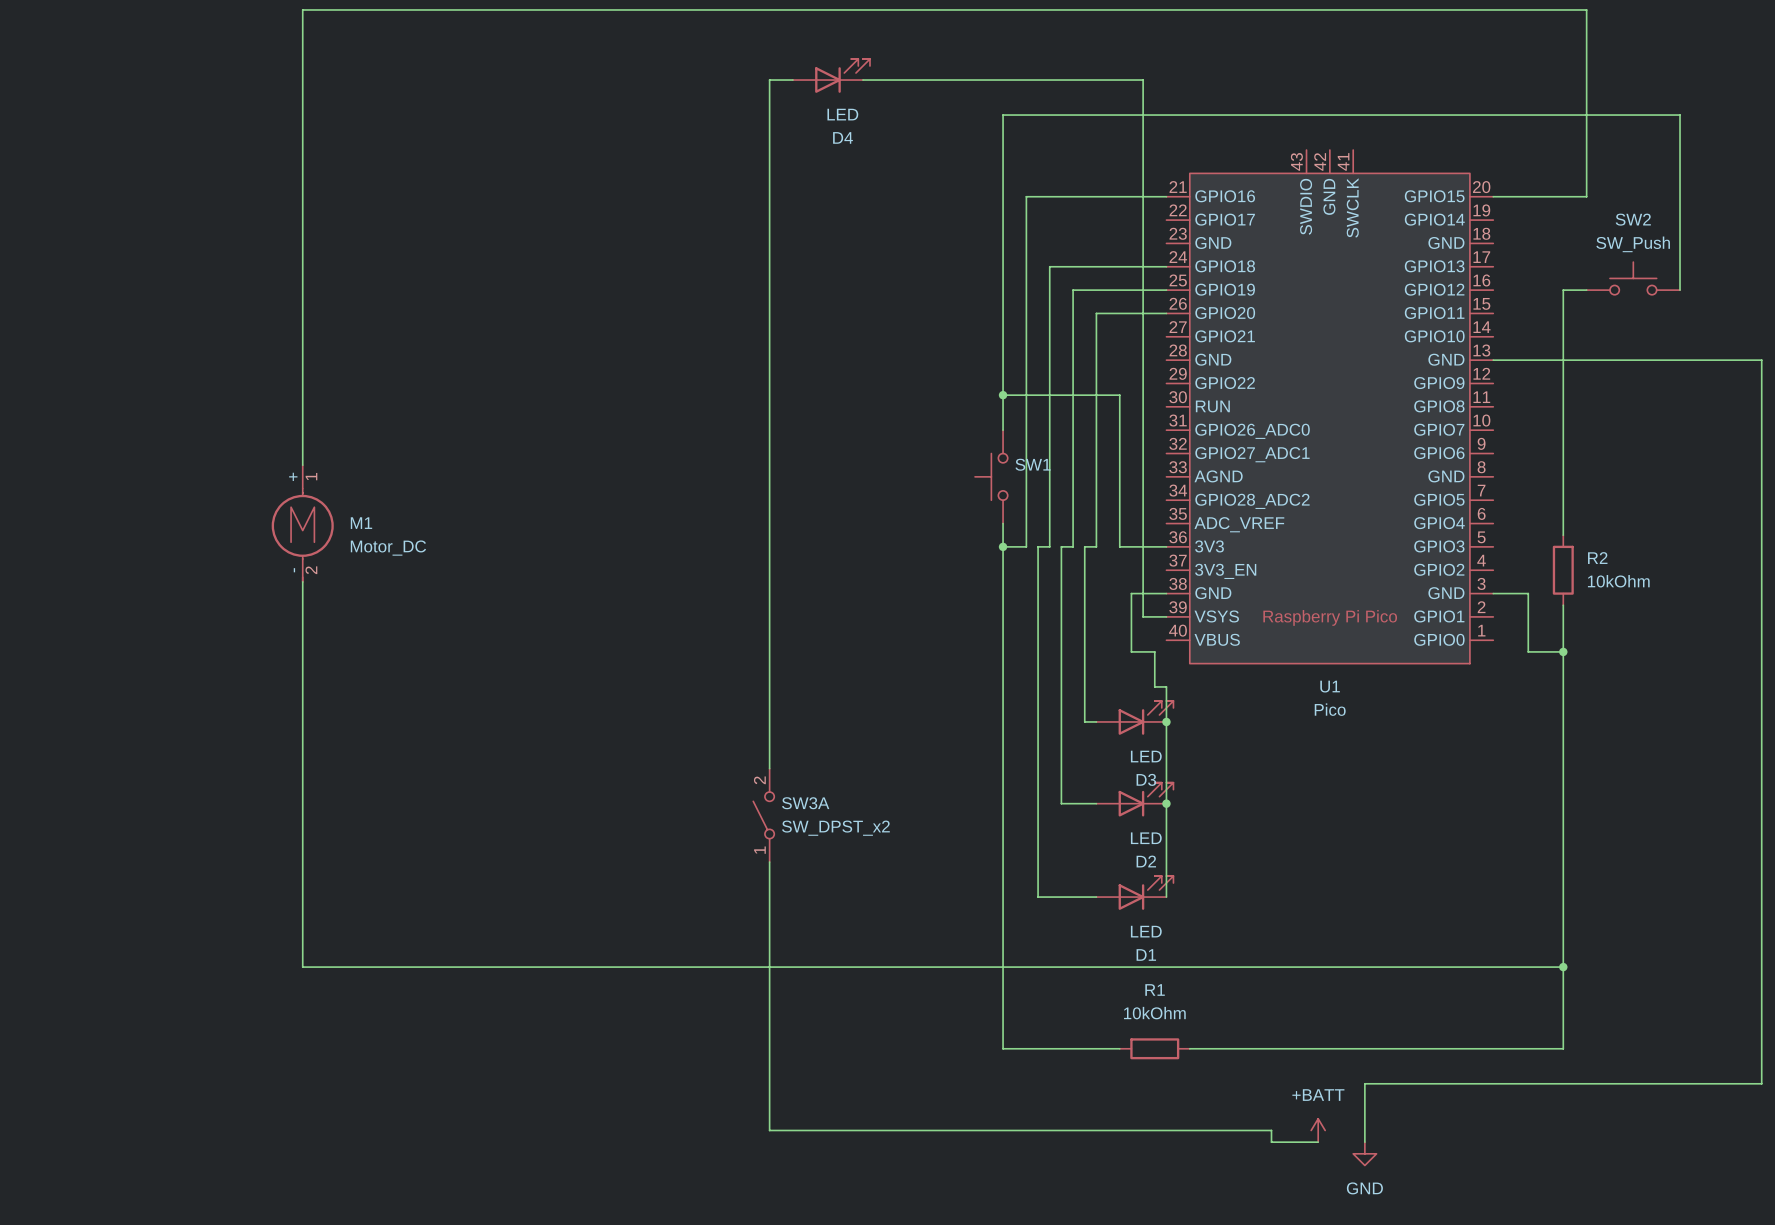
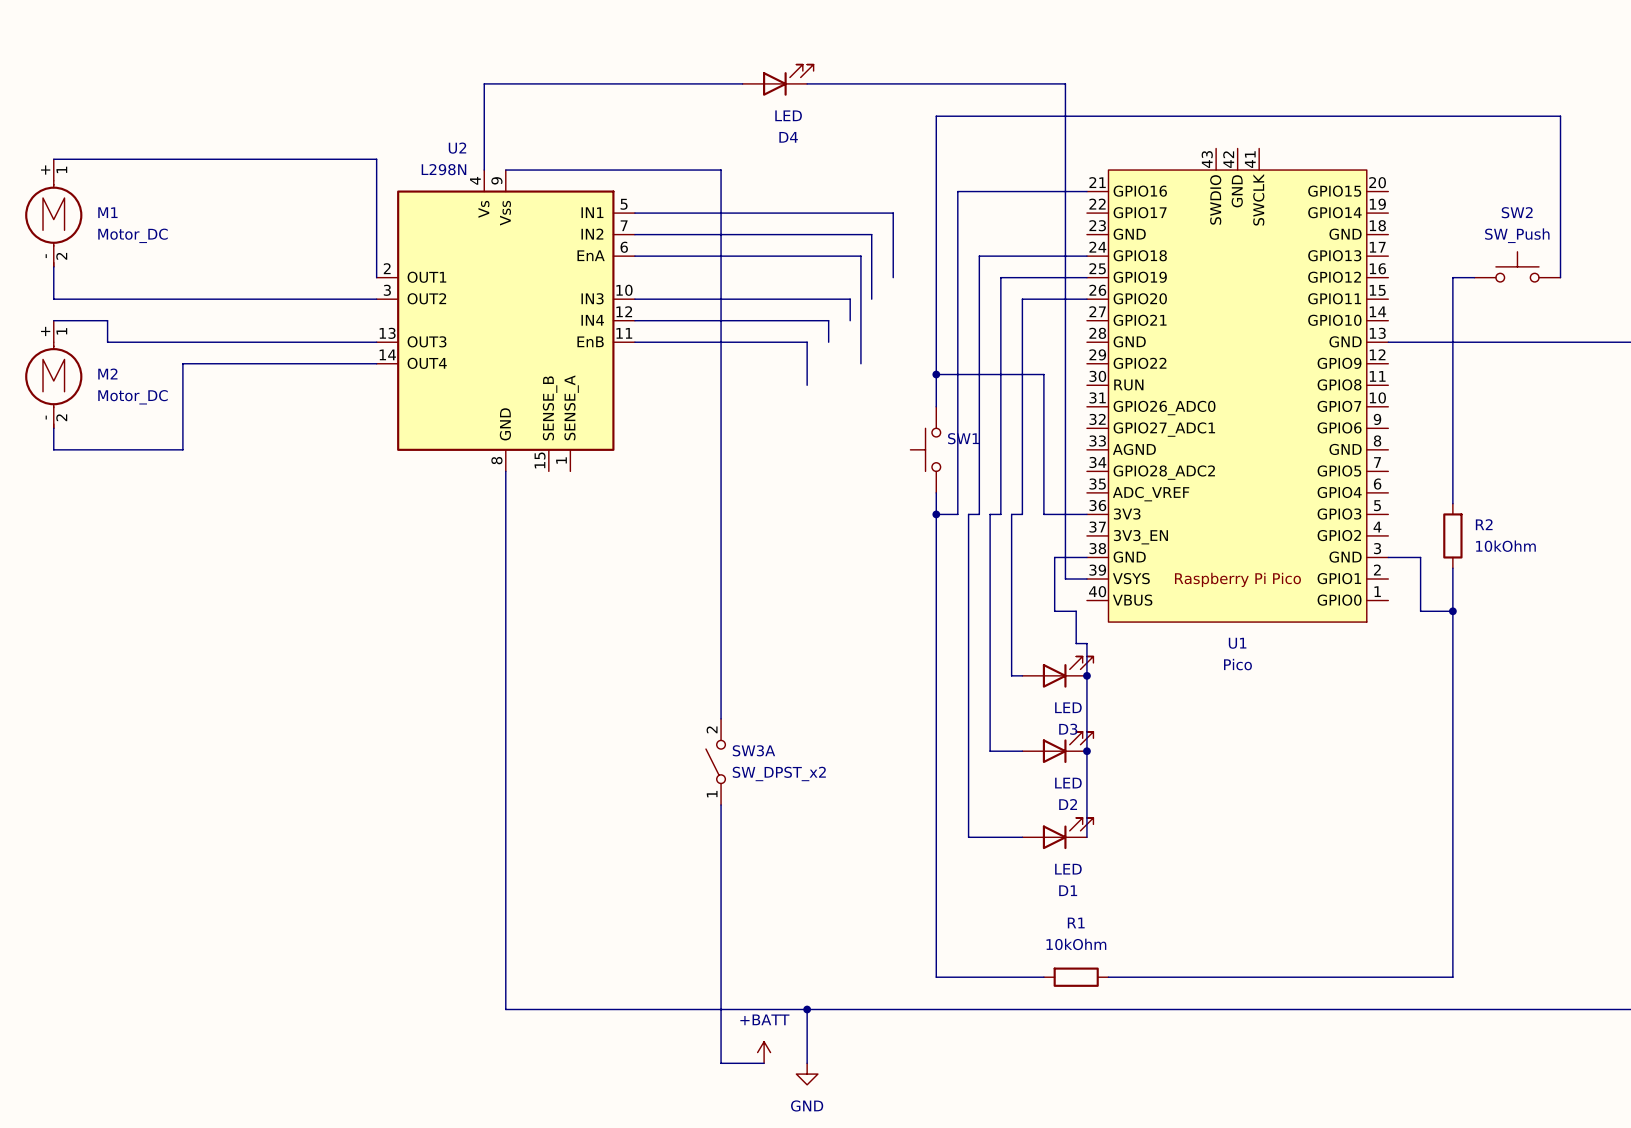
wire: (769, 80) (769, 173) -> (505, 170) (721, 170)
wire: none -> (721, 83) (484, 83) (484, 170)
wire: none -> (53, 159) (376, 159) (376, 277)
wire: (1493, 196) (1586, 196) (1586, 9) (302, 9) (302, 465) -> none
wire: none -> (634, 213) (893, 213) (893, 277)
wire: none -> (634, 234) (871, 234) (871, 299)
wire: none -> (634, 256) (860, 256) (860, 363)
wire: none -> (53, 266) (53, 299) (376, 299)
wire: none -> (634, 299) (850, 299) (850, 320)
wire: none -> (53, 320) (107, 320) (107, 342) (376, 342)
U2: none -> L298N (505, 320)
wire: none -> (634, 320) (828, 320) (828, 342)
wire: none -> (634, 342) (807, 342) (807, 385)
wire: none -> (376, 363) (182, 363) (182, 449) (53, 449) (53, 428)
M2: none -> Motor_DC (53, 374)
M1 position: (302, 523) -> (53, 213)
wire: (302, 581) (302, 967) (1563, 967) -> none
junction: (1563, 967) -> none
wire: none -> (807, 1009) (807, 1063)
junction: none -> (807, 1009)
wire: (1364, 1083) (1364, 1142) -> (1269, 1009) (505, 1009) (505, 471)
wire: (769, 1130) (1271, 1130) (1271, 1142) (1318, 1142) -> (721, 1052) (721, 1063) (764, 1063)
power symbol: none -> +BATT (764, 1052)
power symbol: +BATT (1318, 1130) -> none
power symbol: none -> GND (807, 1074)
power symbol: GND (1364, 1153) -> none

